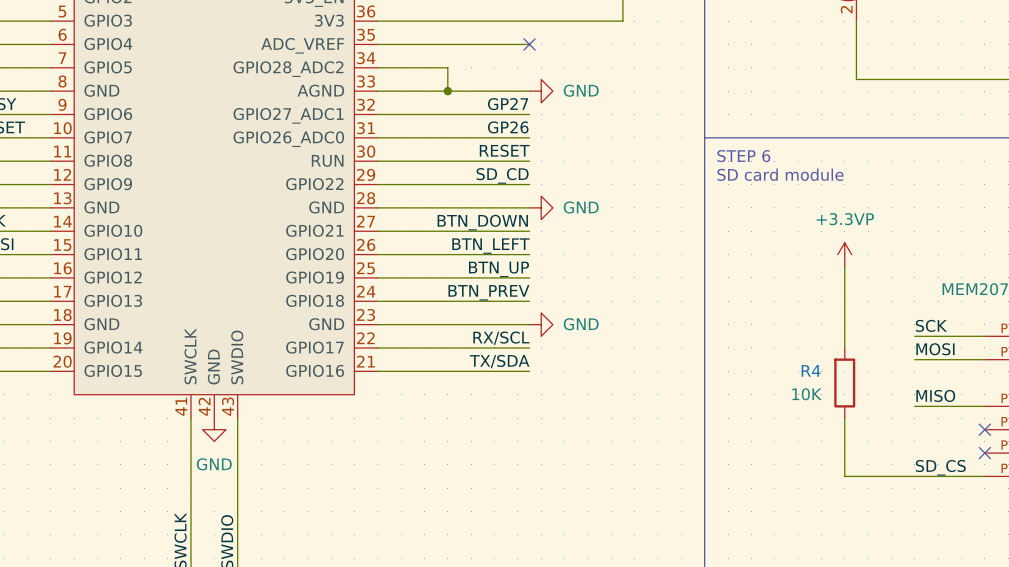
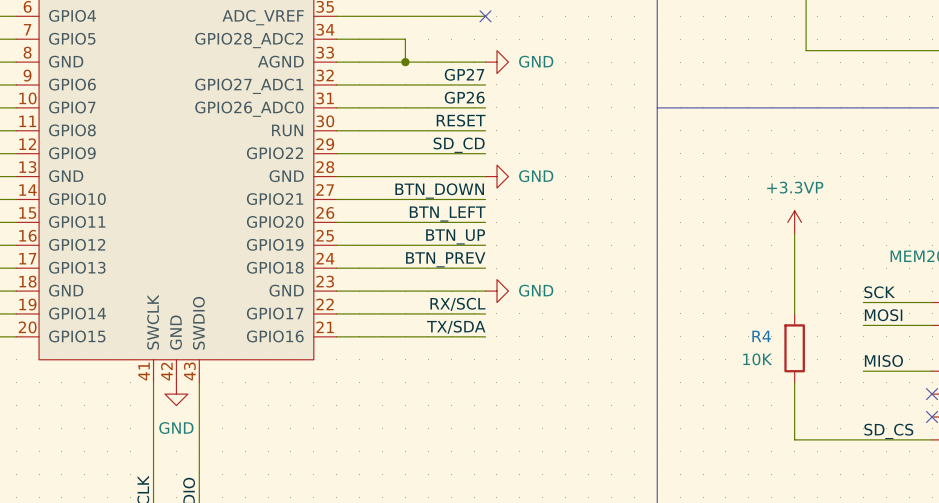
text: STEP 6 (743, 156) -> none
text: SD card module (780, 174) -> none

